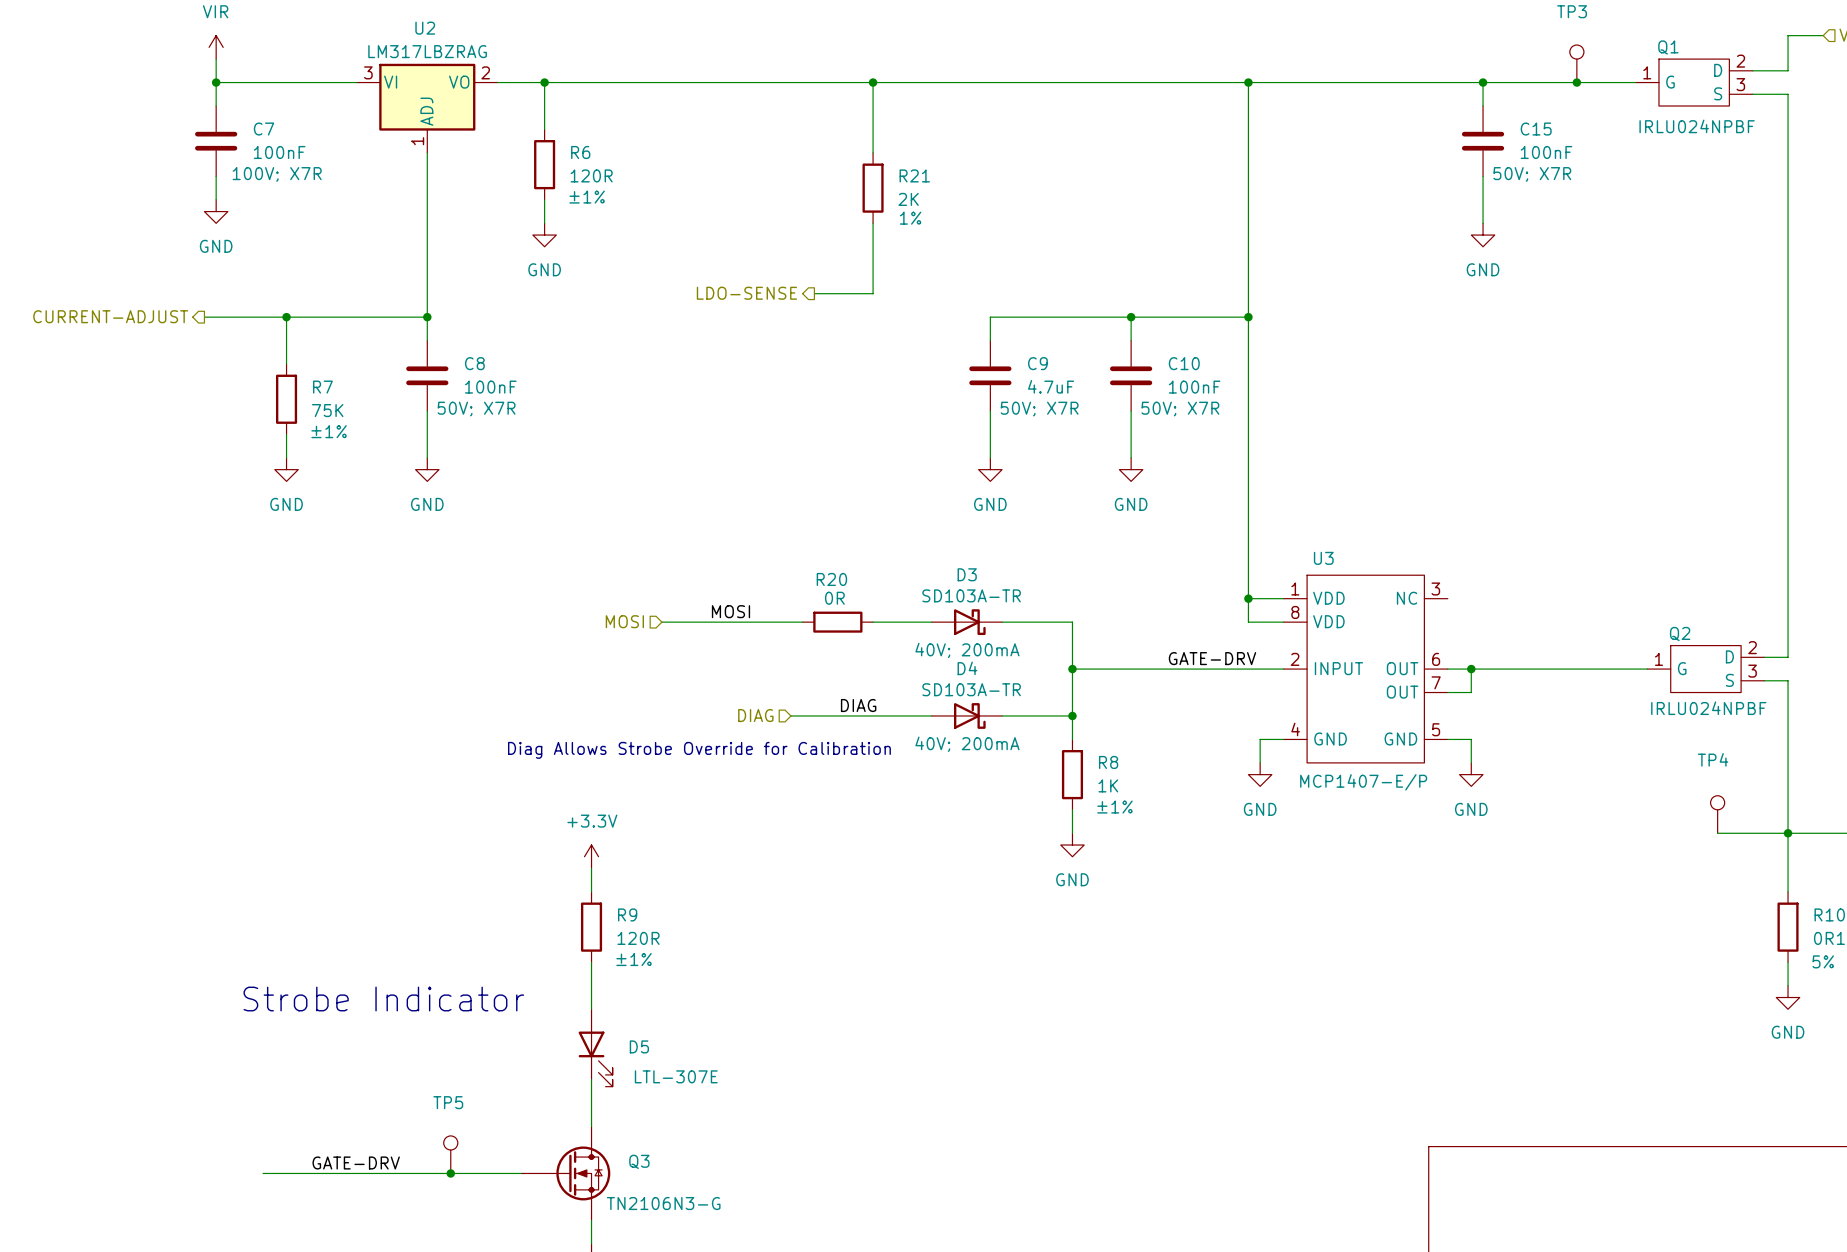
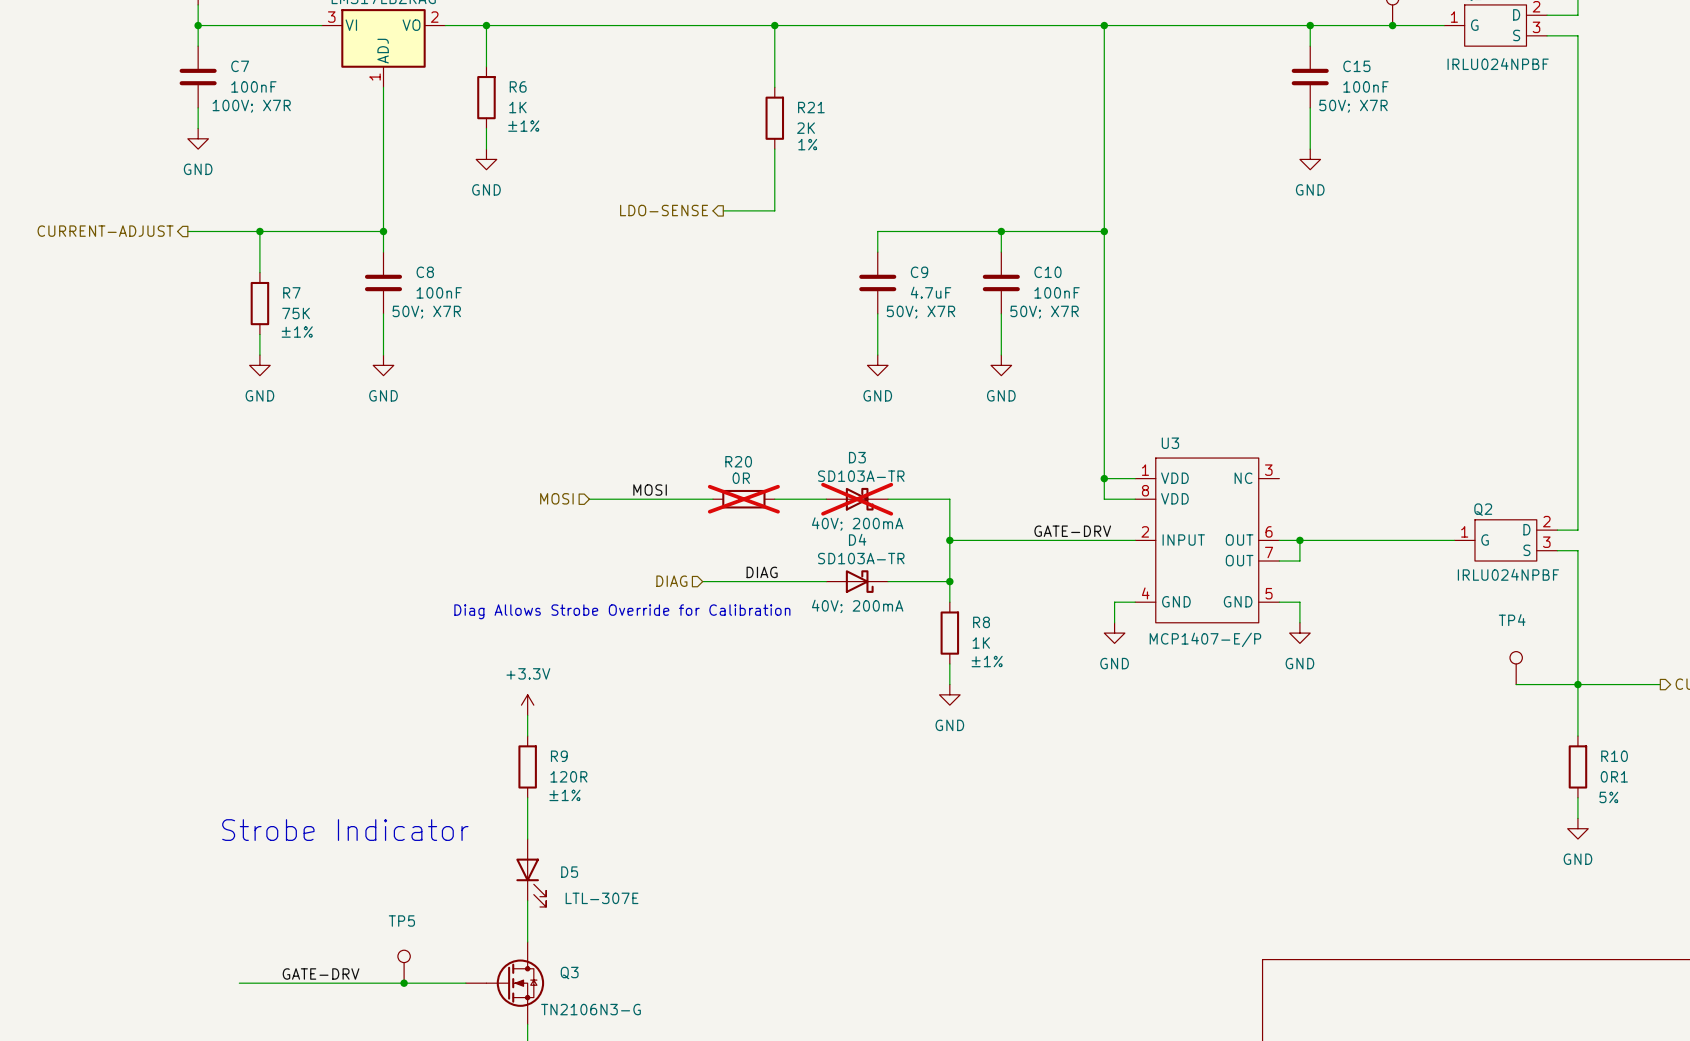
R6 value: 120R (591, 175) -> 1K (517, 107)
R20 do-not-place cross: none -> (743, 499)
D3 do-not-place cross: none -> (857, 499)

